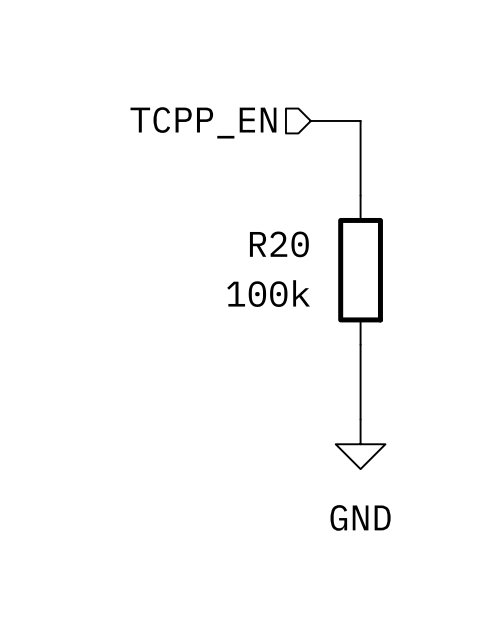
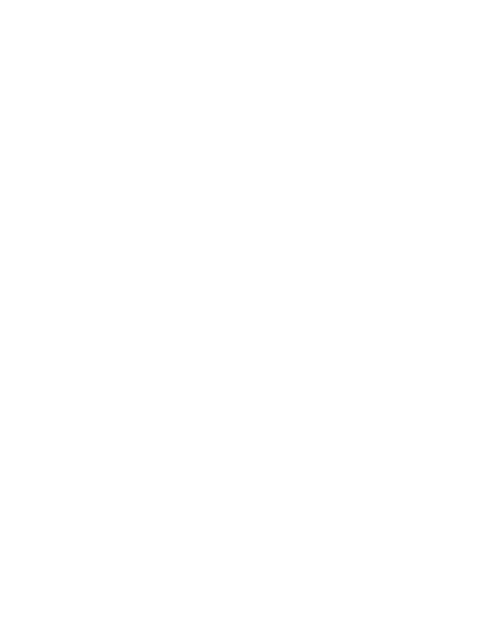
wire: (310, 120) (360, 120) (360, 195) -> none
hierarchical label: TCPP_EN (203, 122) -> none
R20: 100k (360, 270) -> none
wire: (360, 344) (360, 419) -> none
power symbol: GND (360, 444) -> none

